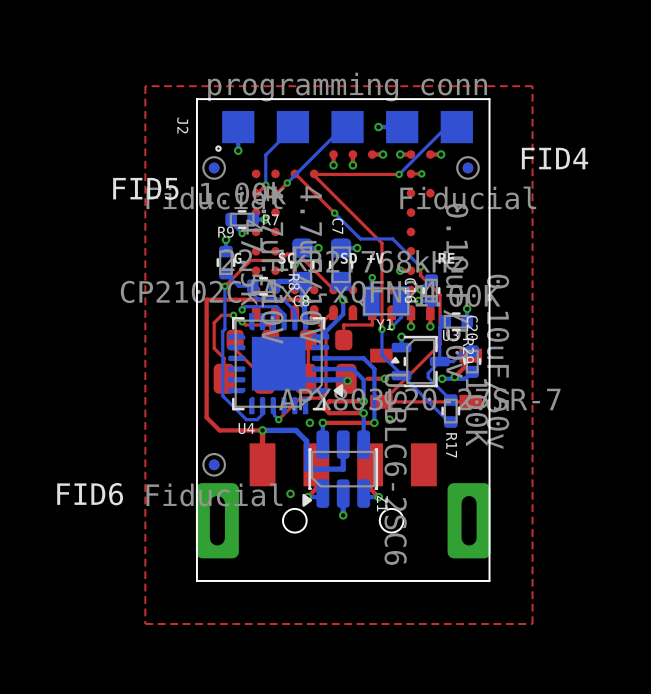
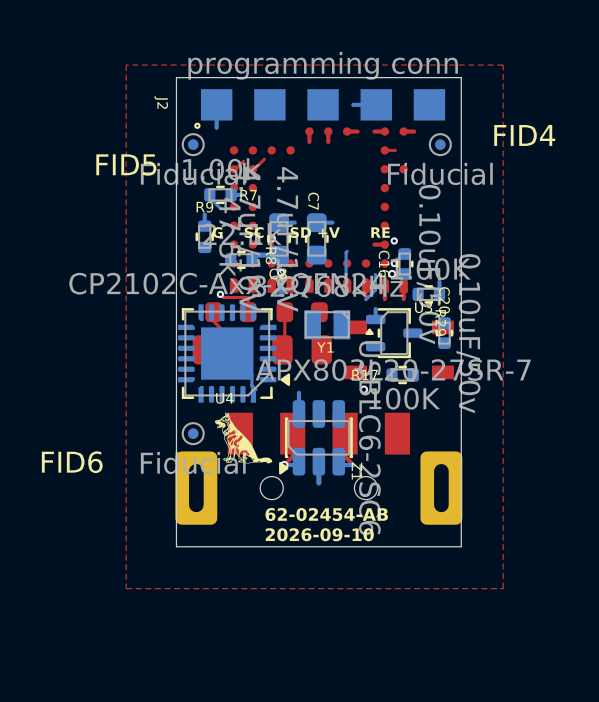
bottom track: (292, 127) (265, 155) (265, 185) -> none
bottom track: (347, 127) (343, 127) (287, 183) -> none
via: (378, 127) -> none
bottom track: (457, 127) (446, 127) (399, 174) -> none
via: (238, 150) -> none
via: (383, 154) -> none
via: (400, 154) -> none
via: (441, 154) -> none
via: (333, 165) -> none
via: (352, 165) -> none
top track: (294, 173) (334, 213) -> none
via: (421, 173) -> none
top track: (399, 174) (313, 174) (381, 243) (381, 329) -> none
via: (399, 174) -> none
via: (287, 183) -> none
via: (265, 185) -> none
bottom track: (334, 213) (360, 238) (392, 238) (420, 266) -> none
via: (334, 213) -> none
via: (264, 219) -> none
via: (242, 233) -> none
via: (226, 239) -> none
via: (318, 248) -> none
via: (357, 248) -> none
top track: (420, 266) (420, 275) (440, 294) (440, 344) (381, 401) (470, 401) -> none
via: (400, 270) -> none
bottom track: (226, 273) (238, 286) (252, 286) (252, 293) (258, 299) (283, 299) (294, 311) (294, 321) -> none
via: (372, 277) -> none
bottom track: (341, 281) (343, 314) (320, 336) (320, 347) -> none
top track: (224, 286) (250, 260) (280, 260) (287, 254) (298, 254) (302, 256) (333, 290) -> none
bottom track: (224, 286) (222, 395) (246, 419) (257, 419) (263, 413) (263, 404) (262, 405) -> none
via: (224, 286) -> none
top track: (304, 299) (206, 299) (206, 417) (219, 430) (262, 430) (262, 464) -> none
via: (343, 299) -> none
Y1 position: (386, 301) -> (327, 324)
via: (467, 308) -> none
bottom track: (242, 309) (245, 306) (276, 306) (284, 314) (284, 321) -> none
via: (242, 309) -> none
top track: (333, 309) (323, 322) (319, 324) (326, 331) (326, 391) (319, 398) (300, 398) (278, 419) -> none
top track: (372, 309) (372, 324) (343, 324) (343, 340) -> none
top track: (233, 315) (221, 315) (214, 322) (214, 348) (224, 358) (224, 378) -> none
via: (233, 315) -> none
bottom track: (445, 321) (439, 327) (439, 361) -> none
via: (411, 326) -> none
via: (430, 326) -> none
via: (391, 327) -> none
bottom track: (381, 329) (381, 355) (450, 421) -> none
via: (381, 329) -> none
via: (401, 336) -> none
bottom track: (472, 351) (463, 351) (453, 361) (439, 361) -> none
bottom track: (320, 358) (363, 358) (374, 369) (374, 422) -> none
bottom track: (439, 361) (428, 373) (428, 377) (450, 400) -> none
U4 position: (285, 363) -> (234, 353)
top track: (465, 366) (454, 377) -> none
bottom track: (320, 369) (352, 369) (363, 379) (363, 401) -> none
bottom track: (472, 371) (465, 378) (442, 378) -> none
via: (454, 377) -> none
top track: (384, 378) (367, 378) -> none
via: (384, 378) -> none
via: (442, 378) -> none
bottom track: (301, 379) (347, 380) -> none
via: (347, 380) -> none
top track: (363, 401) (329, 401) (324, 405) (324, 408) (329, 413) (363, 413) -> none
via: (363, 401) -> none
R17 rotation: 0° (450, 411) -> 90° clockwise (402, 375)
R17 position: (450, 411) -> (402, 375)
bottom track: (363, 413) (363, 444) -> none
via: (363, 413) -> none
via: (278, 419) -> none
via: (309, 422) -> none
via: (322, 422) -> none
top track: (374, 422) (322, 422) -> none
via: (374, 422) -> none
bottom track: (262, 430) (295, 430) (306, 441) (306, 469) (343, 469) (343, 444) -> none
via: (262, 430) -> none
drawing: none -> [214, 412, 273, 464]
via: (290, 493) -> none
via: (378, 497) -> none
via: (343, 515) -> none
text: none -> 62-02454-AB (326, 514)
text: none -> 2026-09-10 (319, 534)

